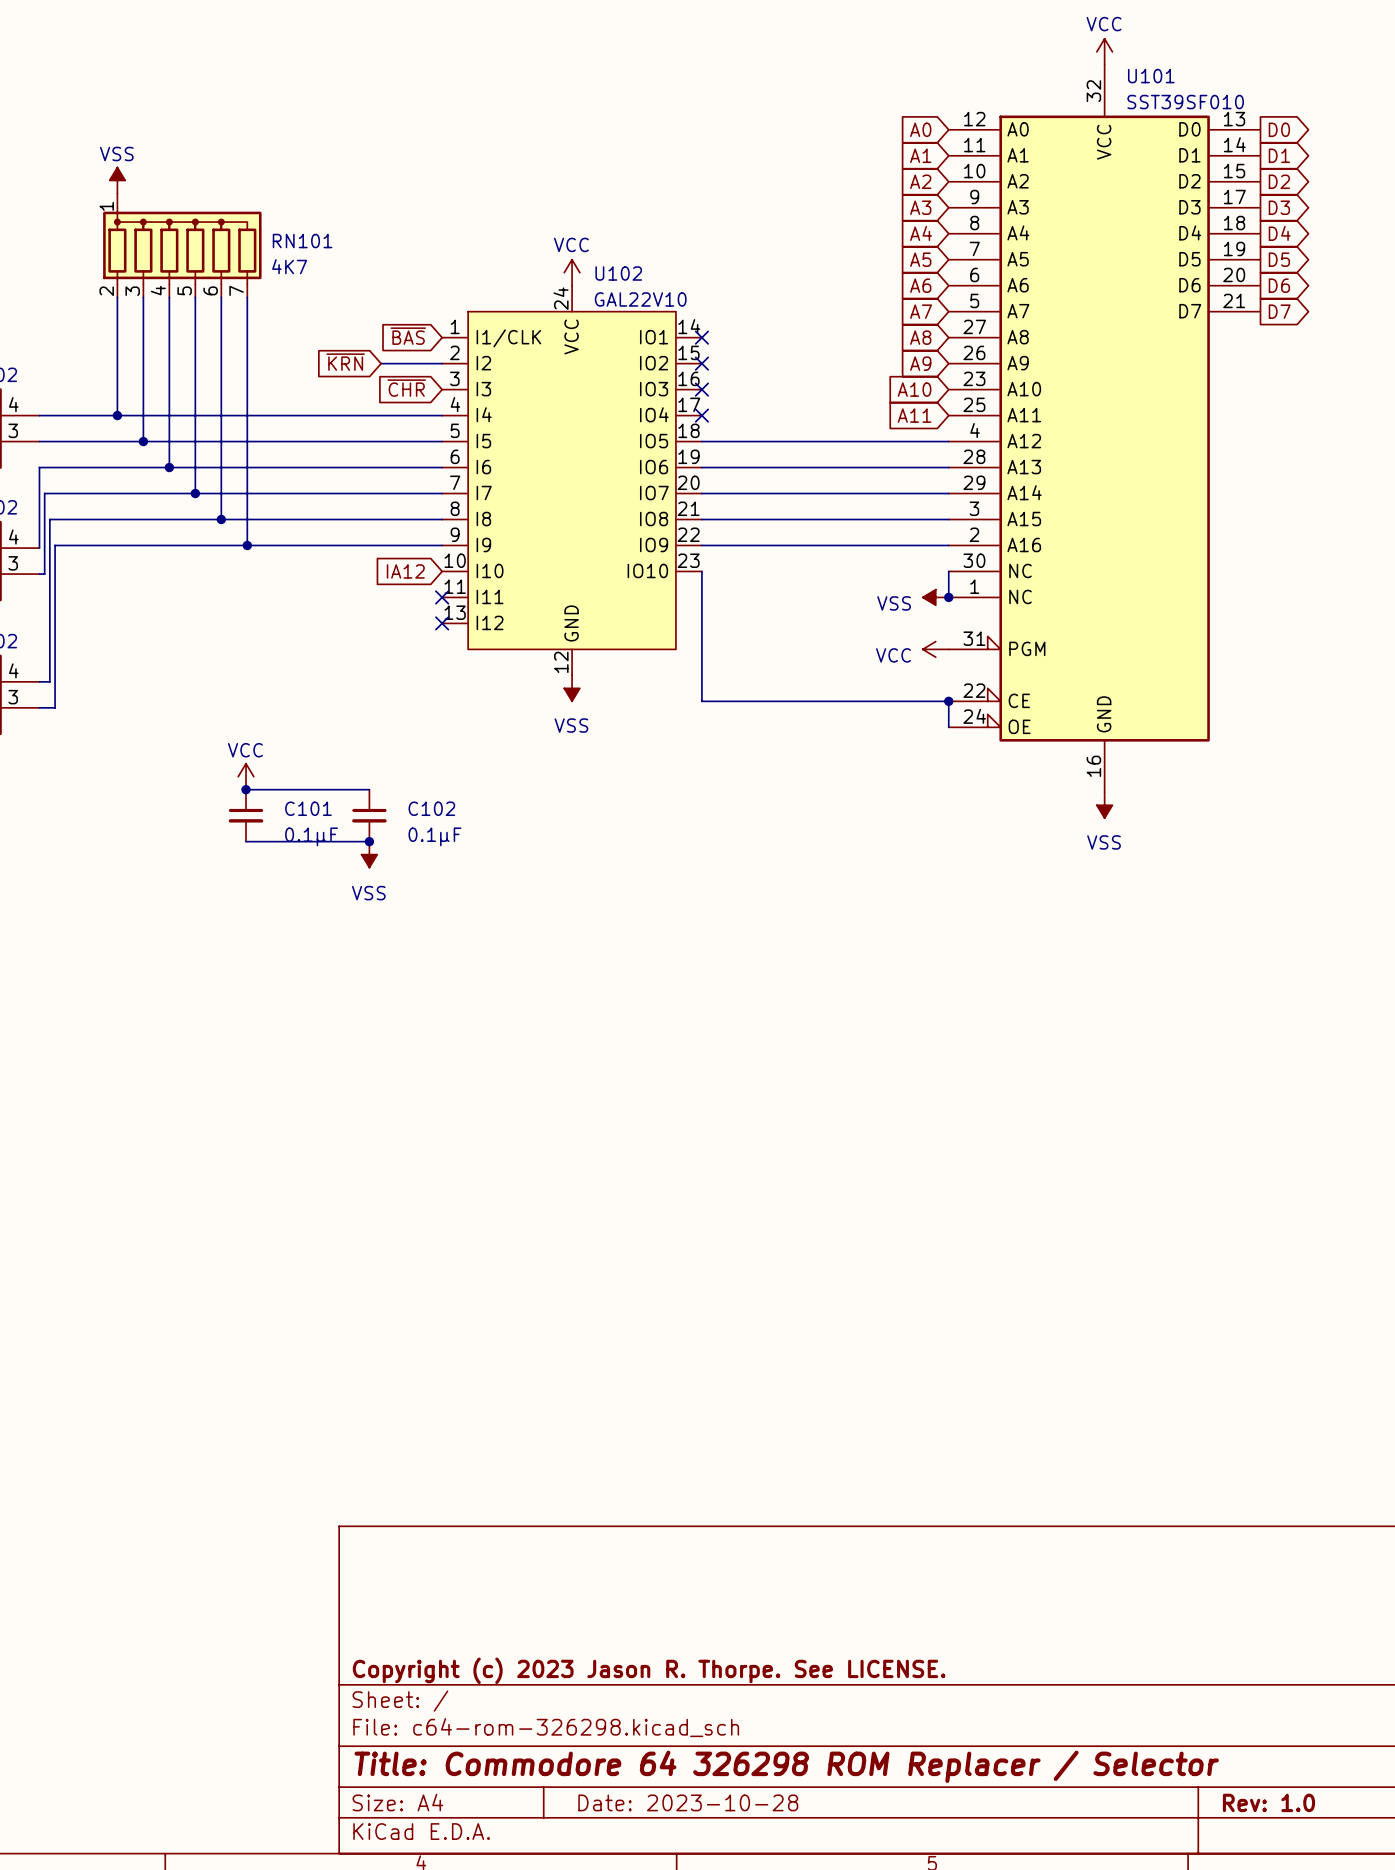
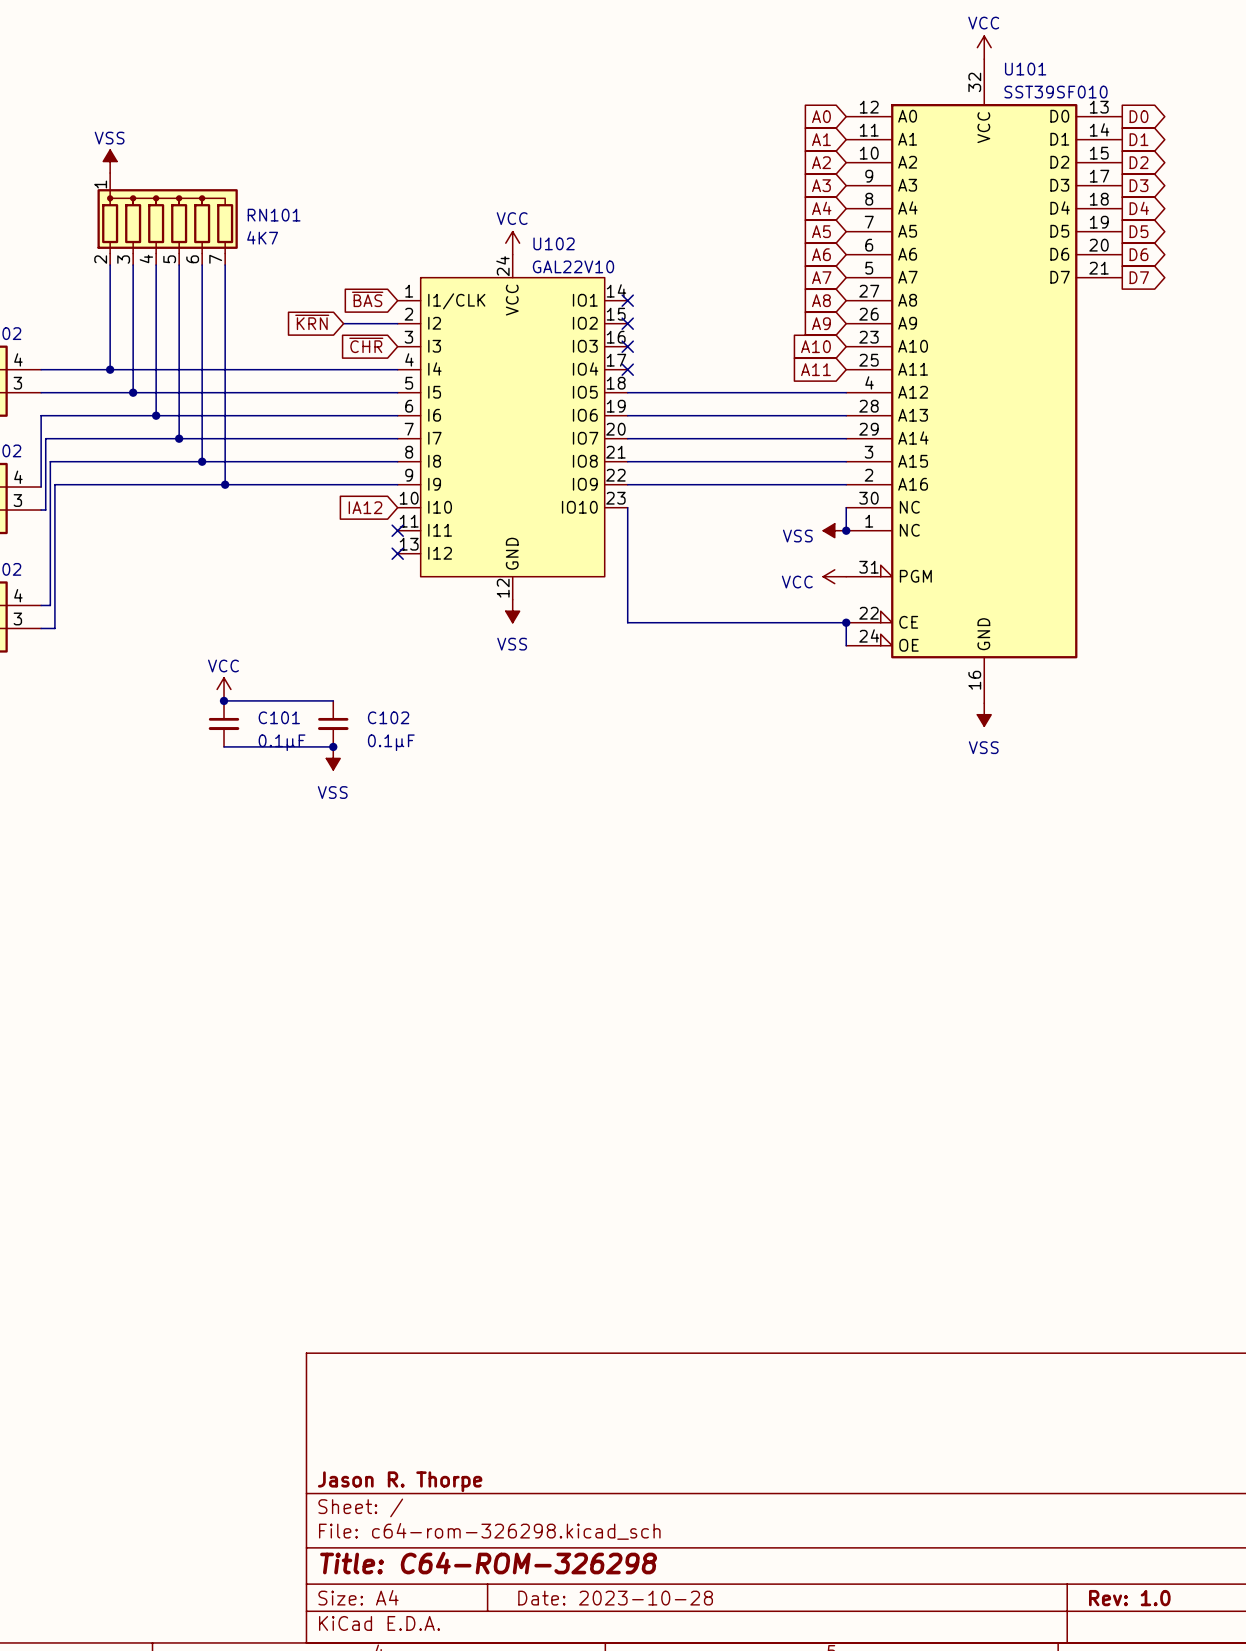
title block: Copyright (c) 2023 Jason R. Thorpe. See LICENSE. (649, 1670) -> Jason R. Thorpe (400, 1481)
title block: Title: Commodore 64 326298 ROM Replacer / Selector (786, 1766) -> Title: C64-ROM-326298 (488, 1563)

